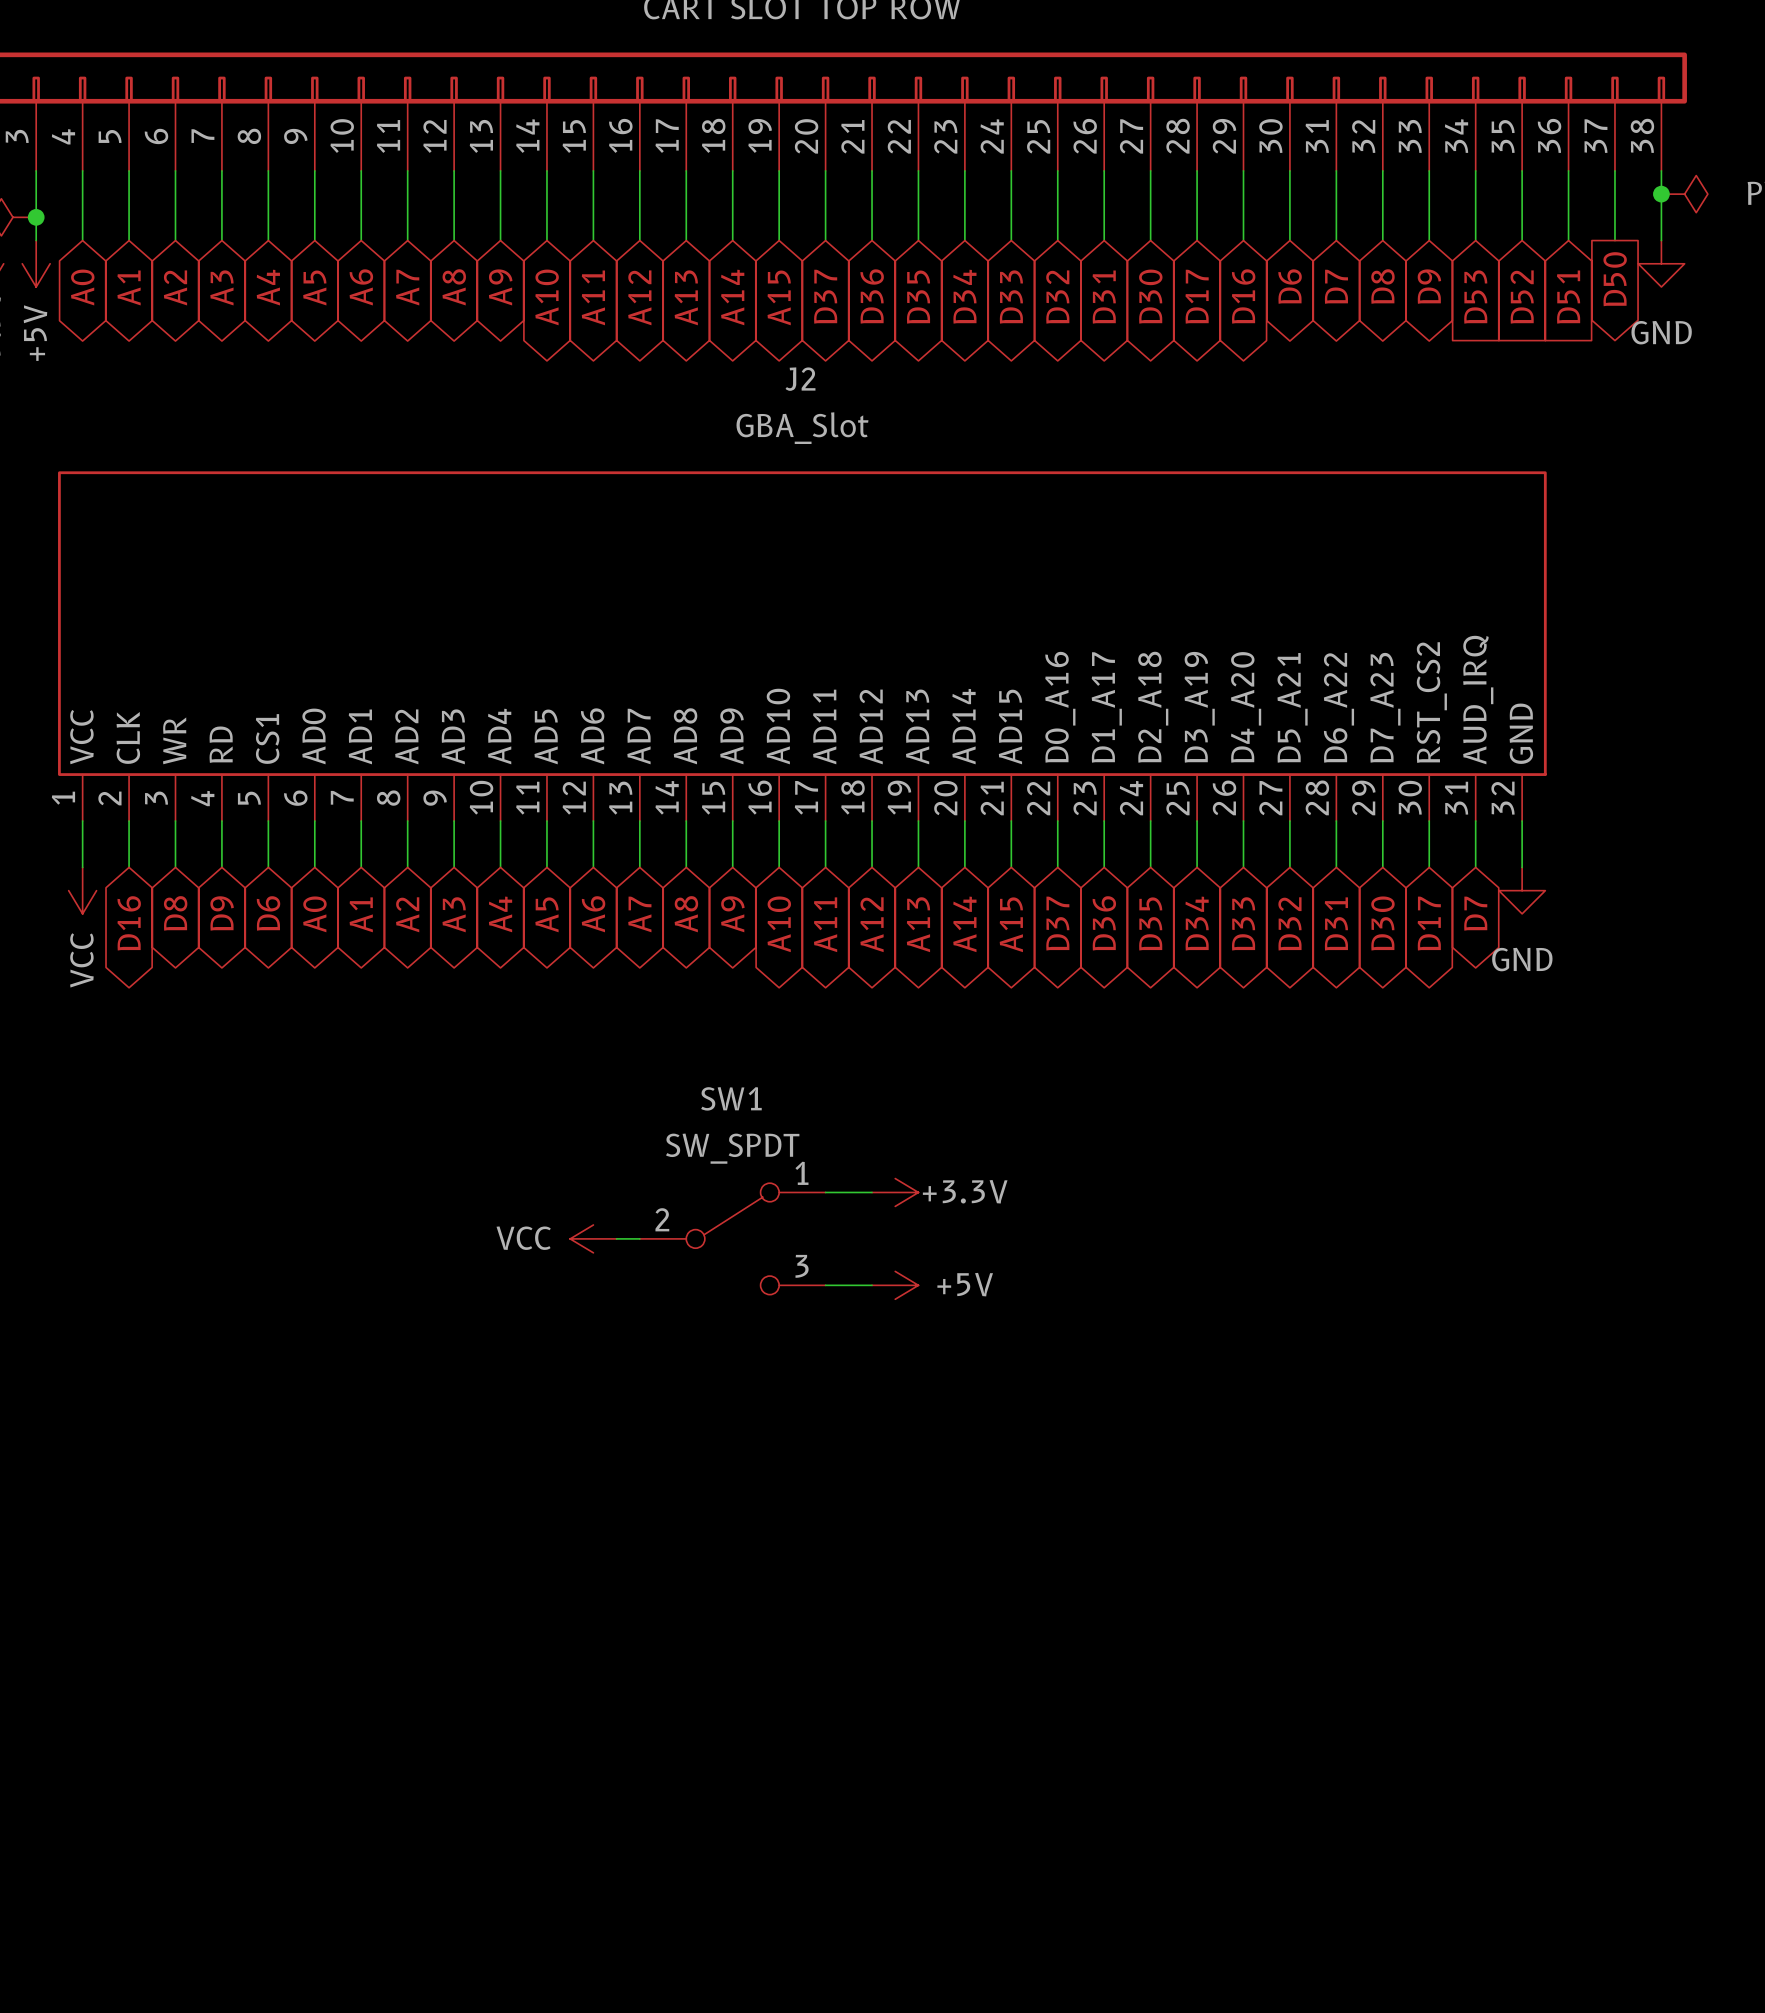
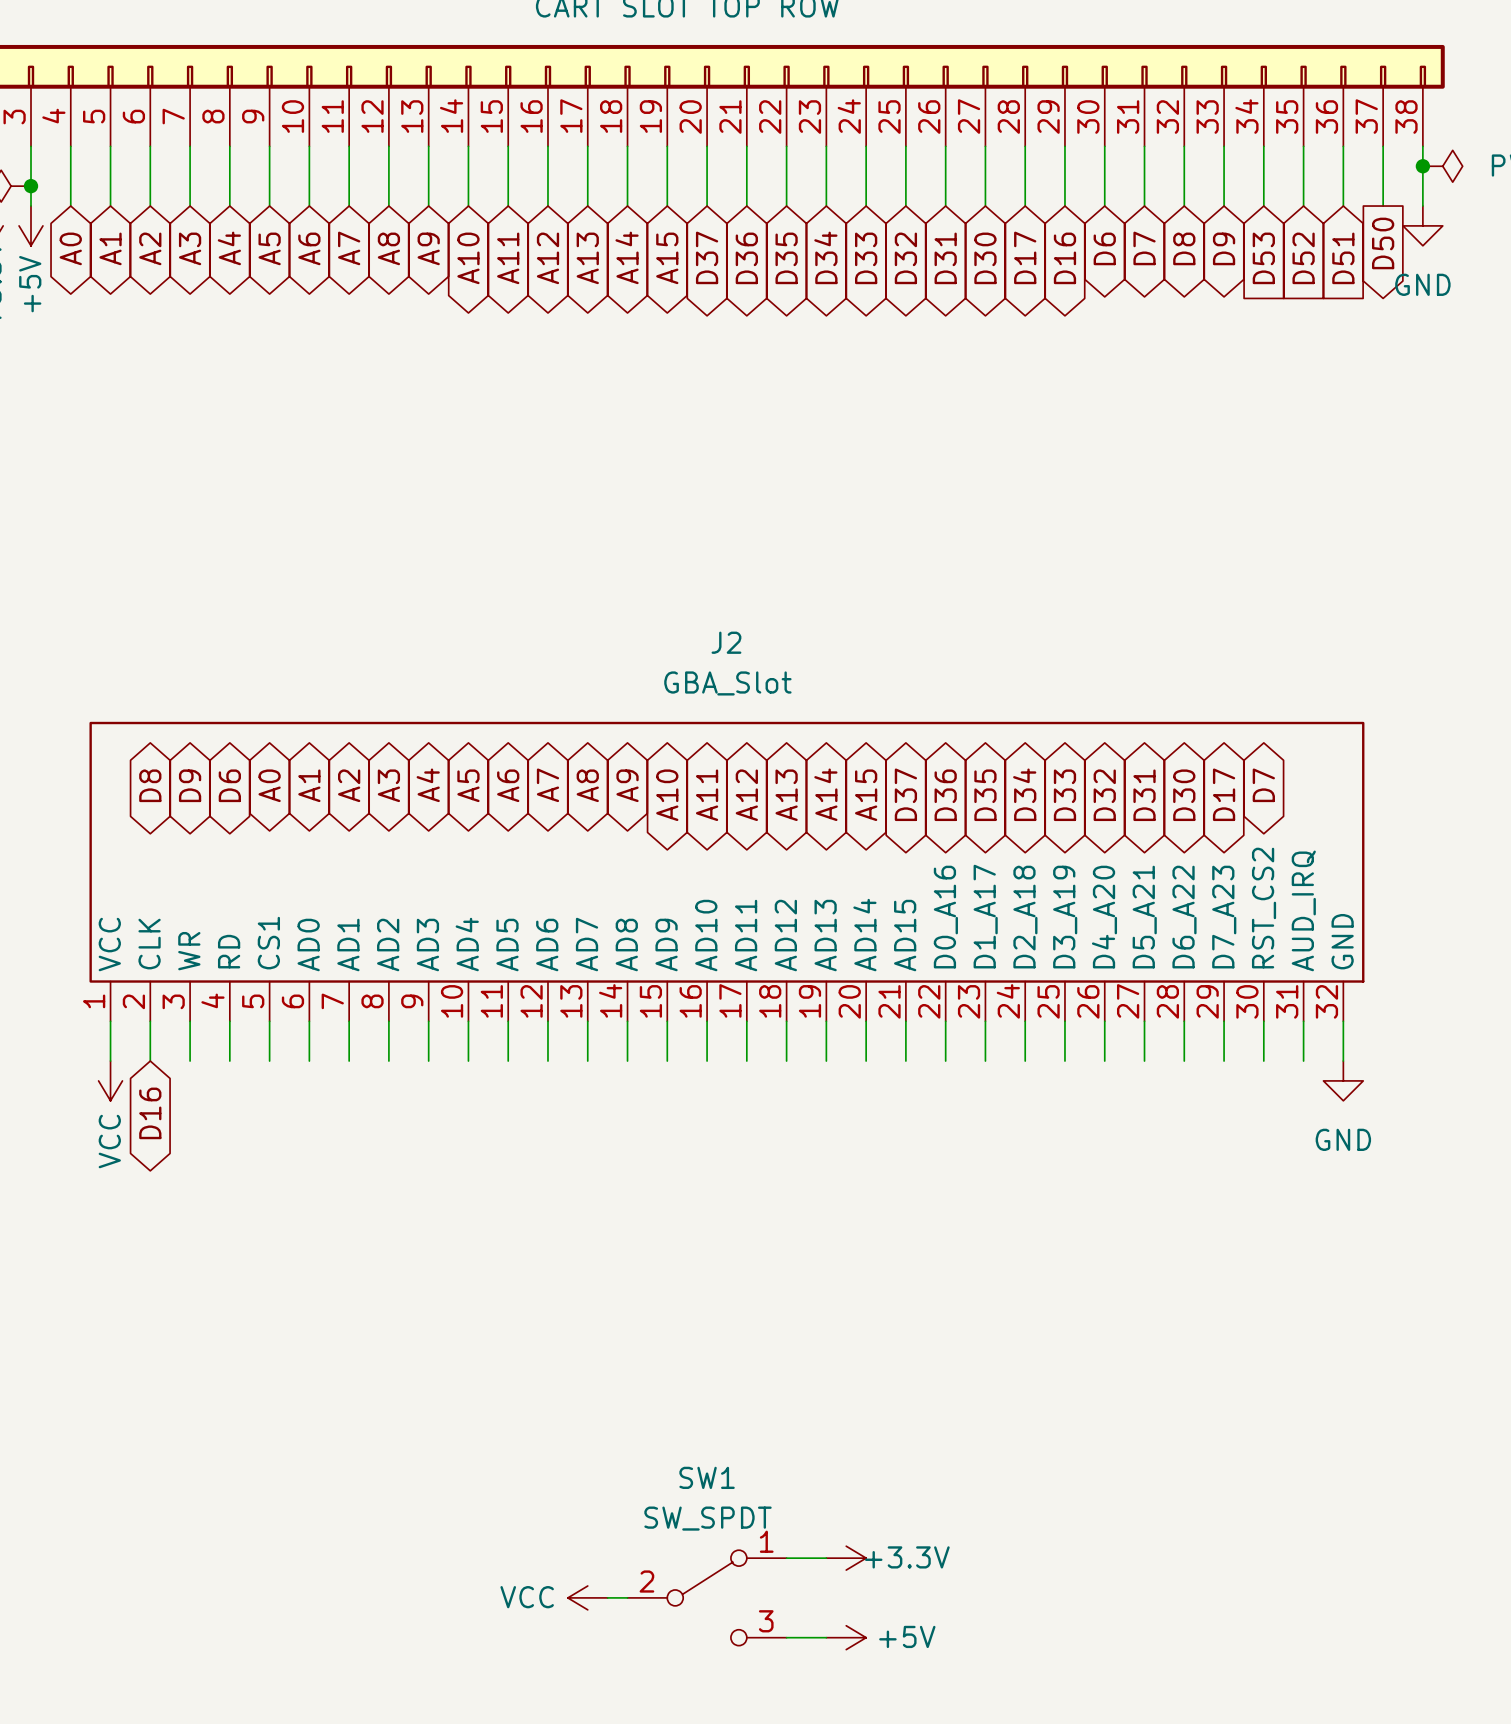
J2 position: (802, 646) -> (726, 871)
wire: (82, 821) (82, 867) -> (110, 1021) (110, 1061)
wire: (129, 821) (129, 867) -> (150, 1021) (150, 1061)
wire: (175, 821) (175, 867) -> (190, 1021) (190, 1061)
wire: (221, 821) (221, 867) -> (229, 1021) (229, 1061)
wire: (268, 821) (268, 867) -> (269, 1021) (269, 1061)
wire: (314, 821) (314, 867) -> (309, 1021) (309, 1061)
wire: (361, 821) (361, 867) -> (349, 1021) (349, 1061)
wire: (407, 821) (407, 867) -> (388, 1021) (388, 1061)
wire: (454, 821) (454, 867) -> (428, 1021) (428, 1061)
wire: (500, 821) (500, 867) -> (468, 1021) (468, 1061)
wire: (546, 821) (546, 867) -> (508, 1021) (508, 1061)
wire: (593, 821) (593, 867) -> none
wire: (639, 821) (639, 867) -> (587, 1021) (587, 1061)
wire: (686, 821) (686, 867) -> (627, 1021) (627, 1061)
wire: (732, 821) (732, 867) -> (667, 1021) (667, 1061)
wire: (779, 821) (779, 867) -> none
wire: (825, 821) (825, 867) -> (746, 1021) (746, 1061)
wire: (872, 821) (872, 867) -> (786, 1021) (786, 1061)
wire: (918, 821) (918, 867) -> (826, 1021) (826, 1061)
wire: (964, 821) (964, 867) -> (866, 1021) (866, 1061)
wire: (1011, 821) (1011, 867) -> (905, 1021) (905, 1061)
wire: (1057, 821) (1057, 867) -> (945, 1021) (945, 1061)
wire: (1104, 821) (1104, 867) -> (985, 1021) (985, 1061)
wire: (1150, 821) (1150, 867) -> (1025, 1021) (1025, 1061)
wire: (1197, 821) (1197, 867) -> (1064, 1021) (1064, 1061)
wire: (1243, 821) (1243, 867) -> (1104, 1021) (1104, 1061)
wire: (1289, 821) (1289, 867) -> (1144, 1021) (1144, 1061)
wire: (1336, 821) (1336, 867) -> (1184, 1021) (1184, 1061)
wire: (1382, 821) (1382, 867) -> (1224, 1021) (1224, 1061)
wire: (1429, 821) (1429, 867) -> (1263, 1021) (1263, 1061)
wire: (1475, 821) (1475, 867) -> (1303, 1021) (1303, 1061)
wire: (1522, 821) (1522, 867) -> (1343, 1021) (1343, 1061)
power symbol: VCC (82, 890) -> none
power symbol position: GND (1522, 890) -> GND (1343, 1080)
global label position: D16 (129, 923) -> D16 (150, 1113)
wire: (825, 1192) (872, 1192) -> (707, 1021) (707, 1061)
power symbol: +3.3V (895, 1192) -> none
power symbol: VCC (593, 1238) -> none
wire: (616, 1238) (639, 1238) -> (547, 1021) (547, 1061)
SW1 position: (732, 1238) -> (707, 1597)
power symbol: none -> VCC (110, 1080)
wire: (825, 1285) (872, 1285) -> none
power symbol: +5V (895, 1285) -> none
wire: none -> (786, 1558) (826, 1558)
power symbol: none -> +3.3V (846, 1558)
power symbol: none -> VCC (587, 1597)
wire: none -> (607, 1597) (627, 1597)
wire: none -> (786, 1637) (826, 1637)
power symbol: none -> +5V (846, 1637)

